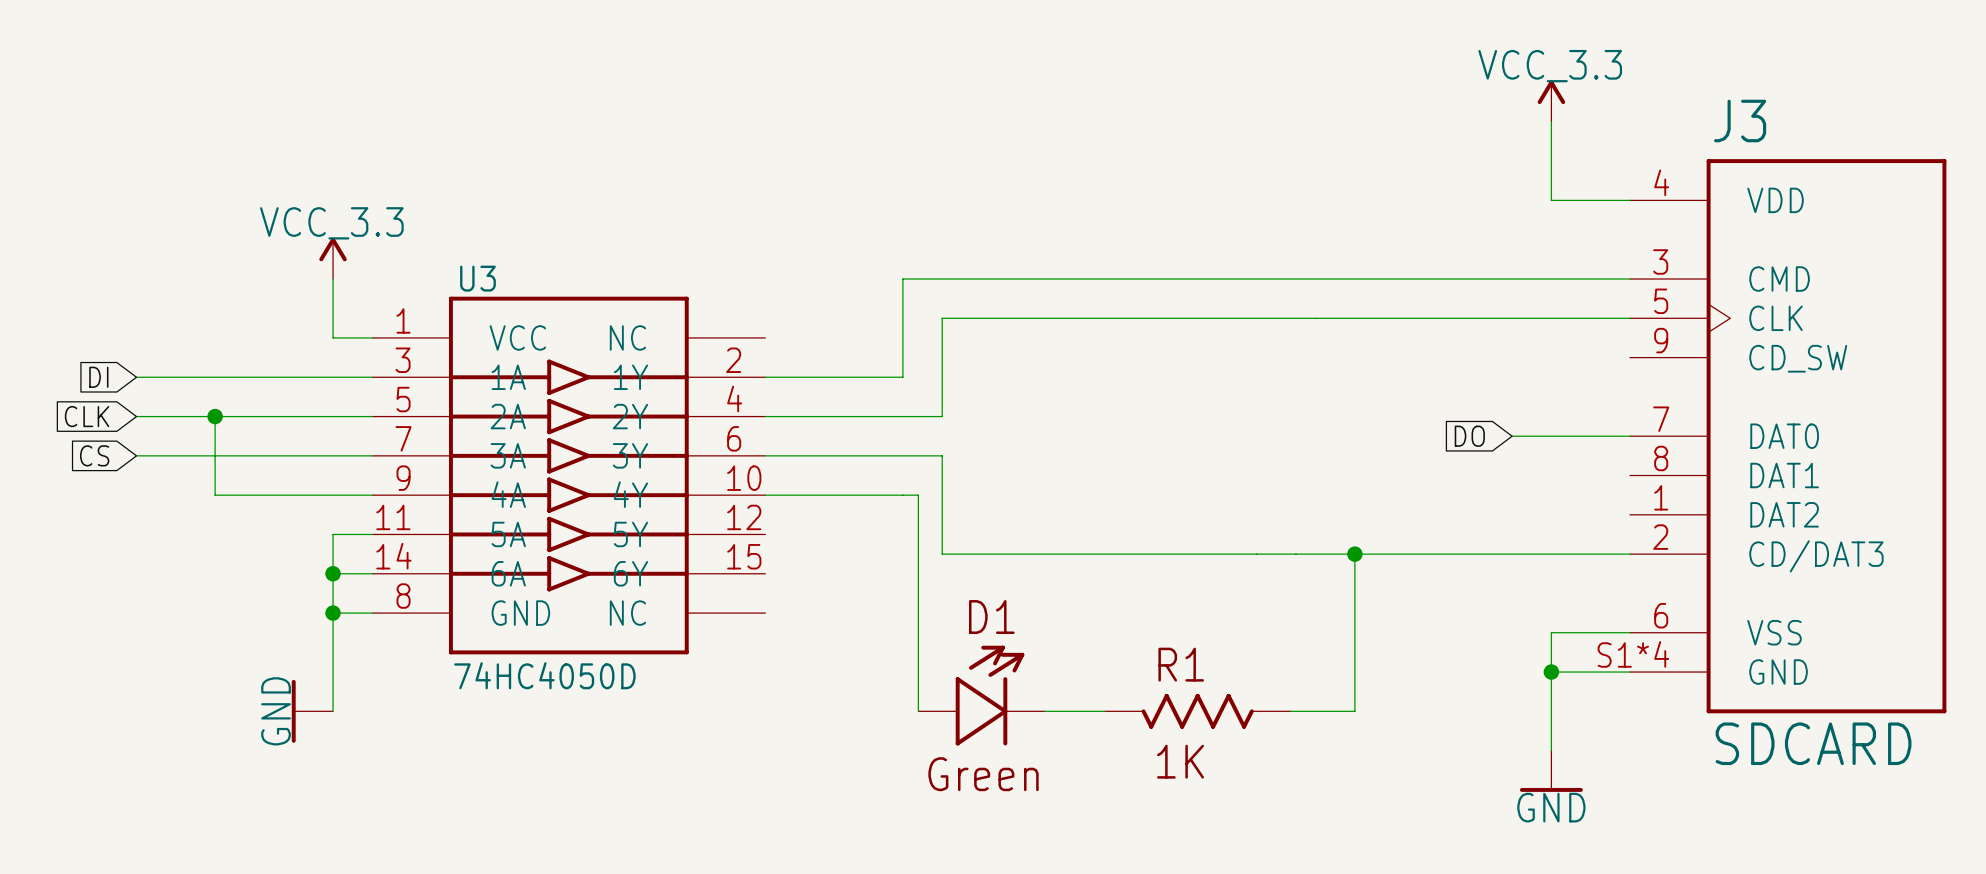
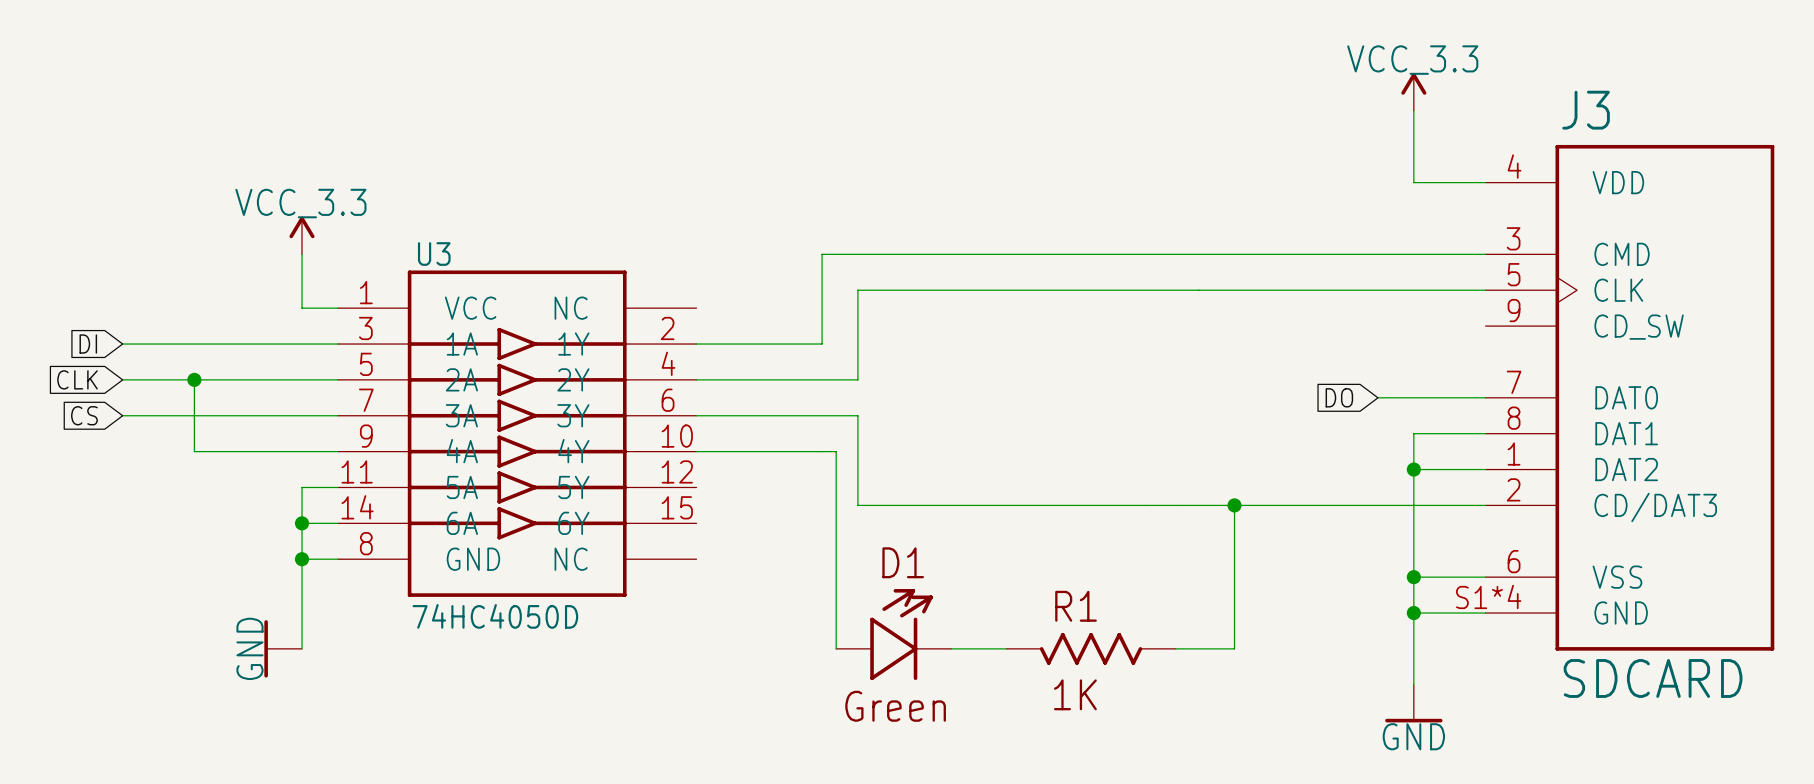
wire: none -> (1485, 433) (1413, 433) (1413, 577)
wire: none -> (1413, 469) (1485, 469)
junction: none -> (1413, 469)
junction: none -> (1413, 577)

